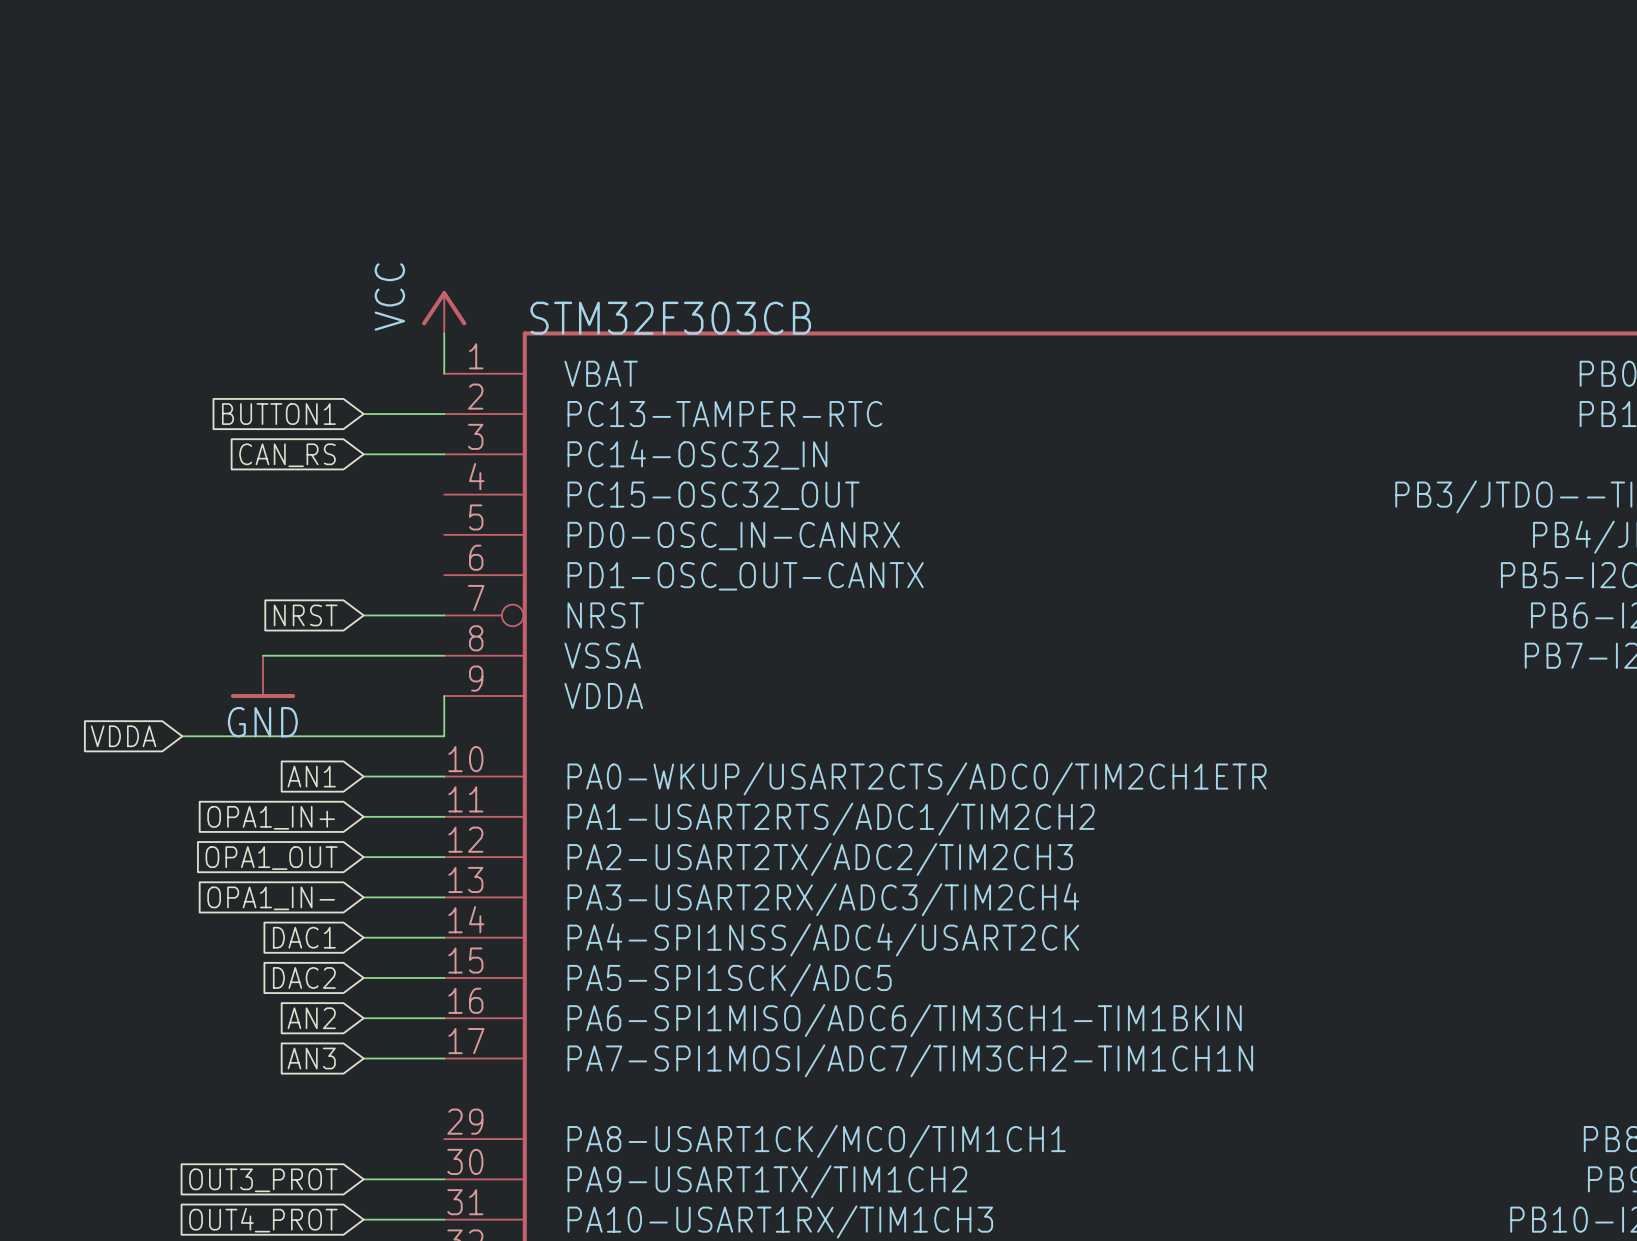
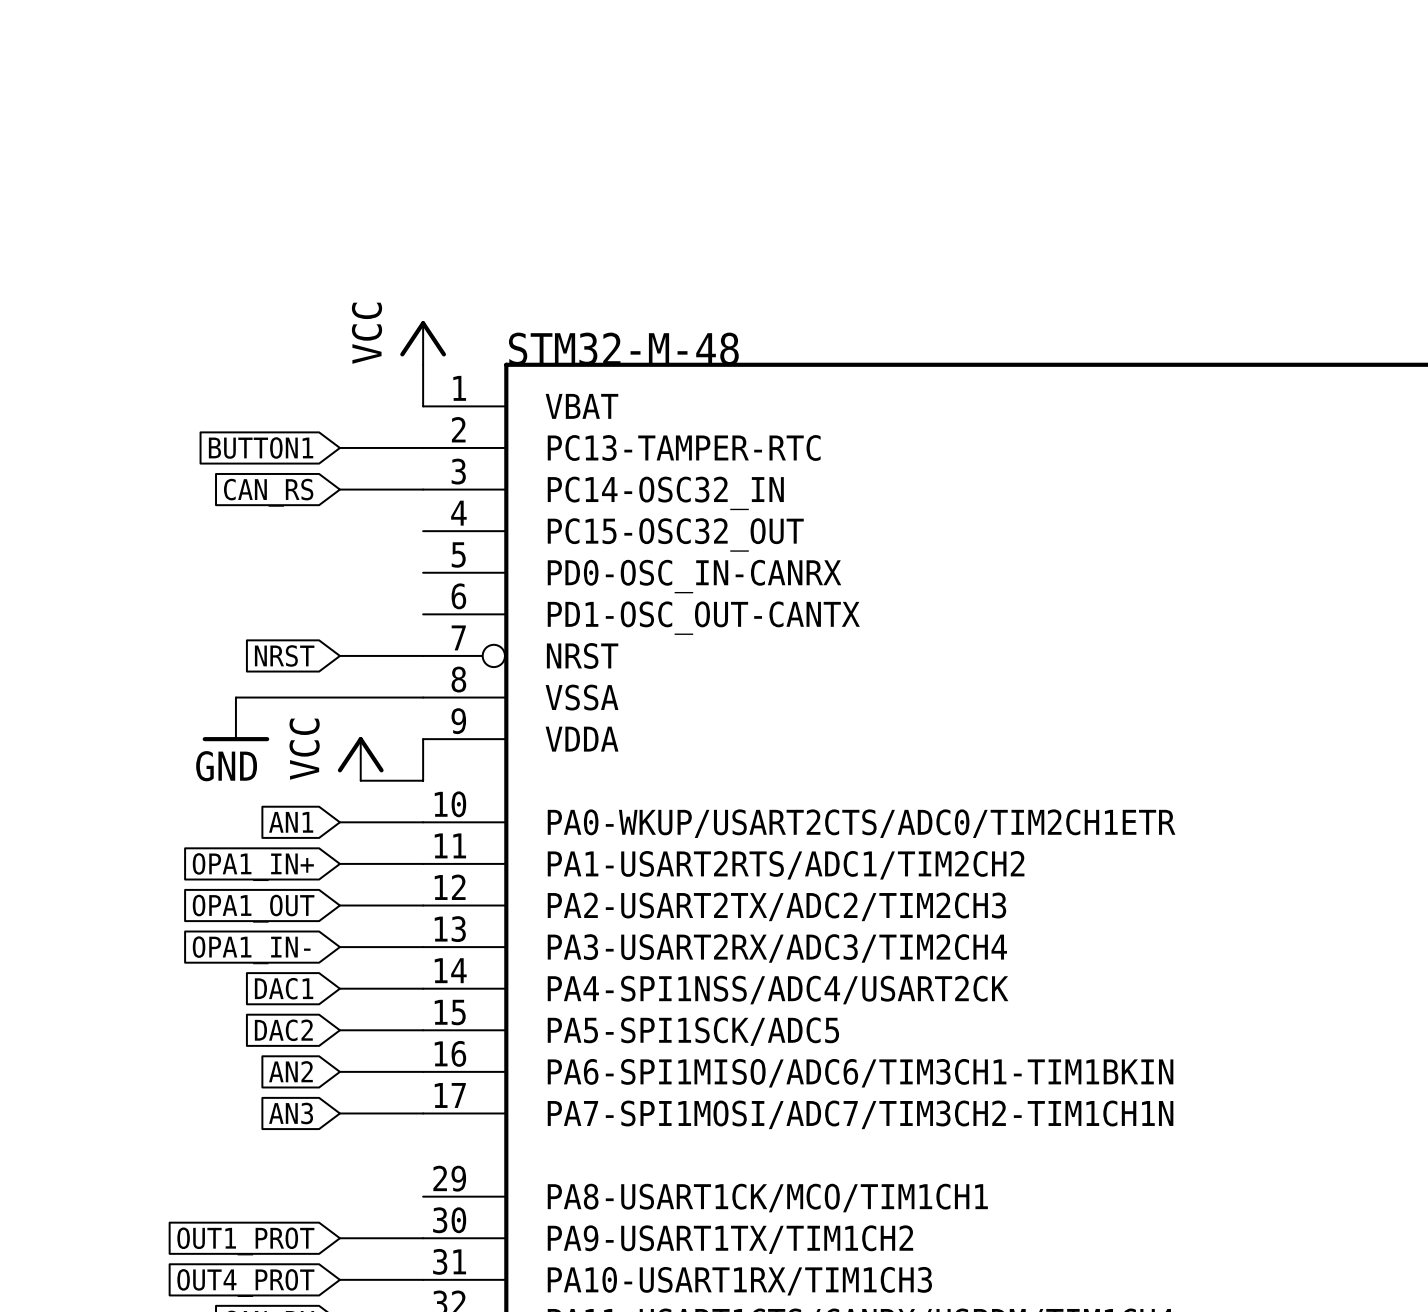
part value: STM32F303CB (670, 318) -> STM32-M-48 (623, 349)
power symbol: none -> VCC (360, 758)
global label: VDDA (123, 736) -> none
wire: (182, 736) (383, 736) -> none
global label: OUT3_PROT (263, 1180) -> OUT1_PROT (245, 1241)

